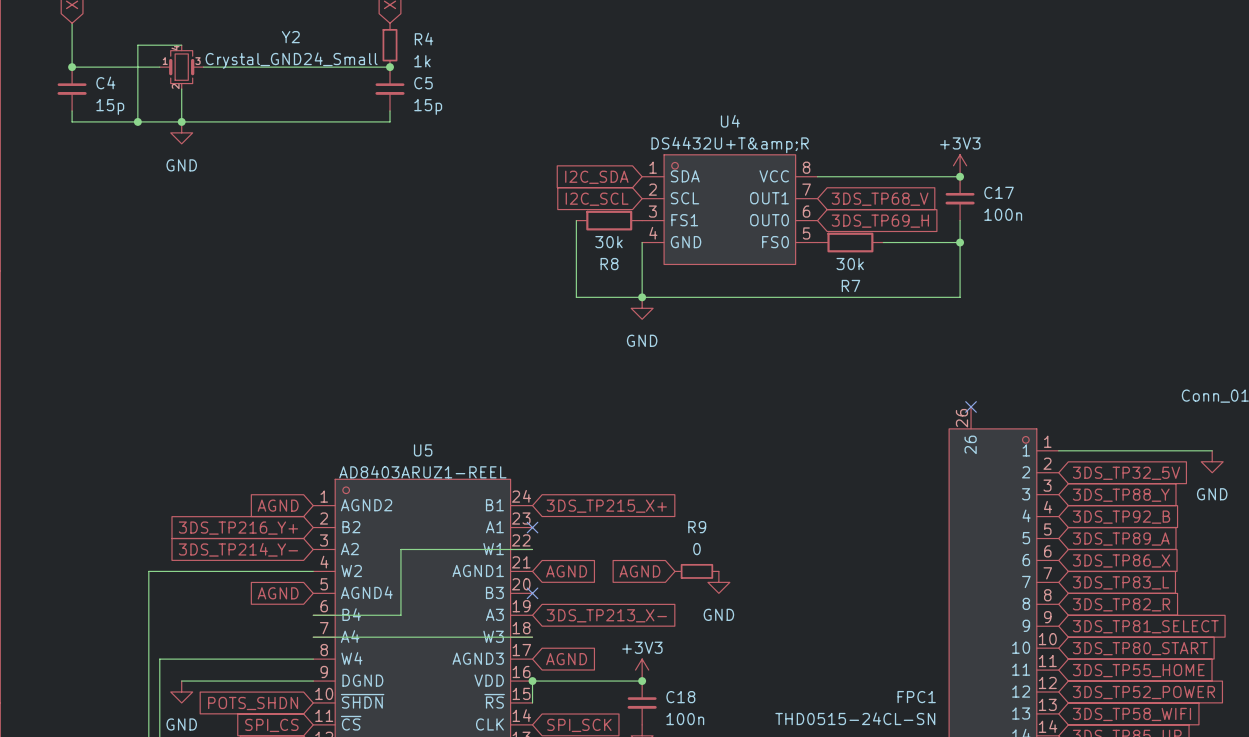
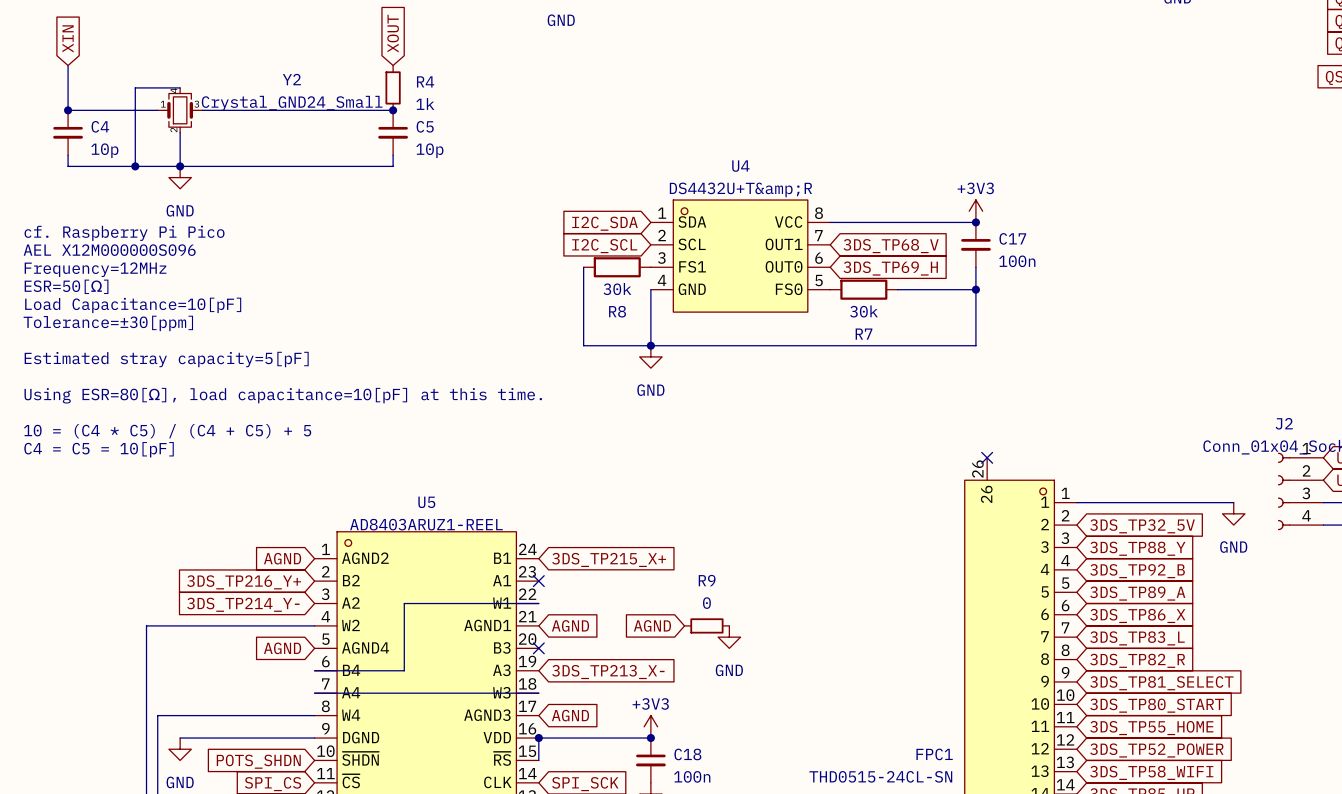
C4 value: 15p (110, 106) -> 10p (104, 150)
C5 value: 15p (428, 106) -> 10p (429, 150)
text: none -> cf. Raspberry Pi Pico (124, 233)
text: none -> AEL X12M000000S096 (109, 250)
text: none -> Frequency=12MHz (95, 269)
text: none -> ESR=50[Ω] (66, 286)
text: none -> Load Capacitance=10[pF] (133, 305)
text: none -> Tolerance=±30[ppm] (108, 323)
text: none -> Estimated stray capacity=5[pF] (166, 359)
text: none -> Using ESR=80[Ω], load capacitance=10[pF] at this time. (283, 395)
text: none -> 10 = (C4 * C5) / (C4 + C5) + 5 (167, 431)
text: none -> C4 = C5 = 10[pF] (99, 449)

